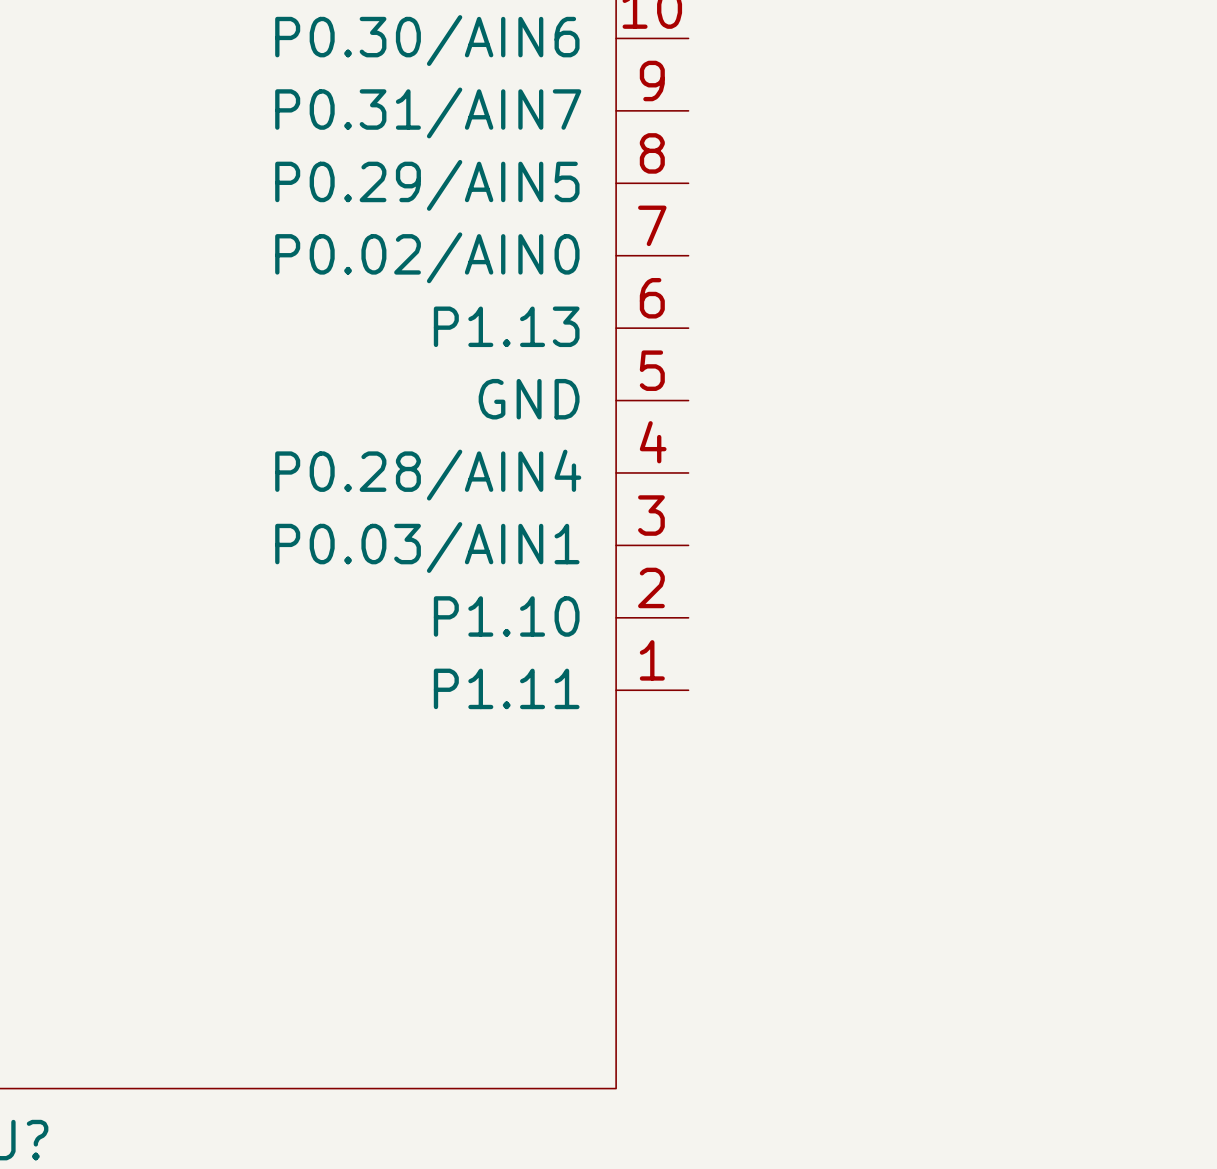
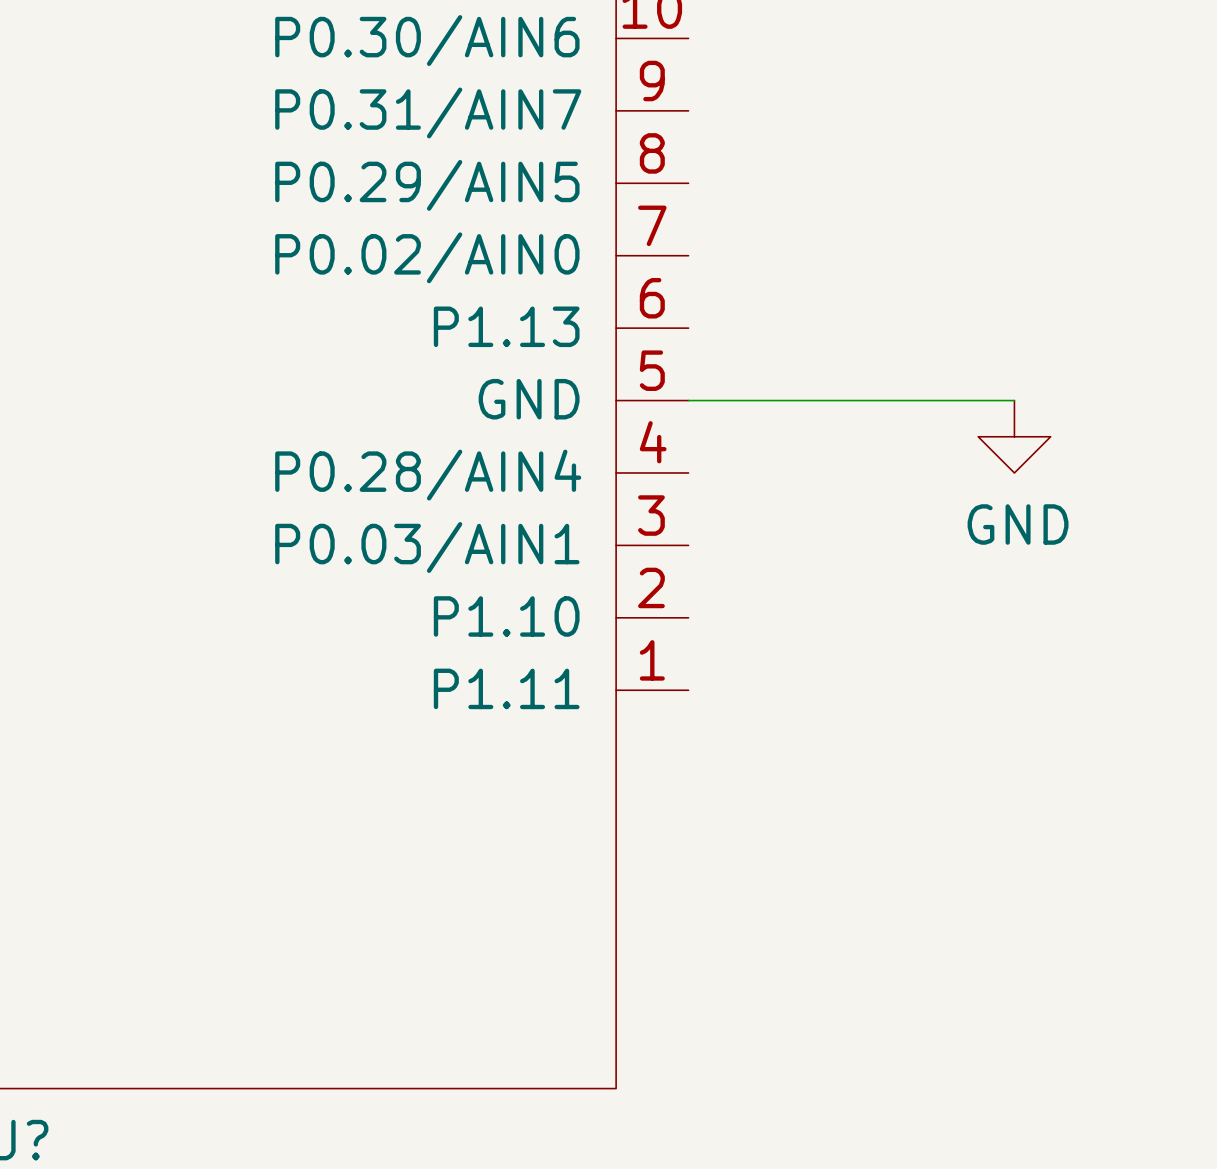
wire: none -> (688, 400) (1014, 400)
power symbol: none -> GND (1014, 436)

